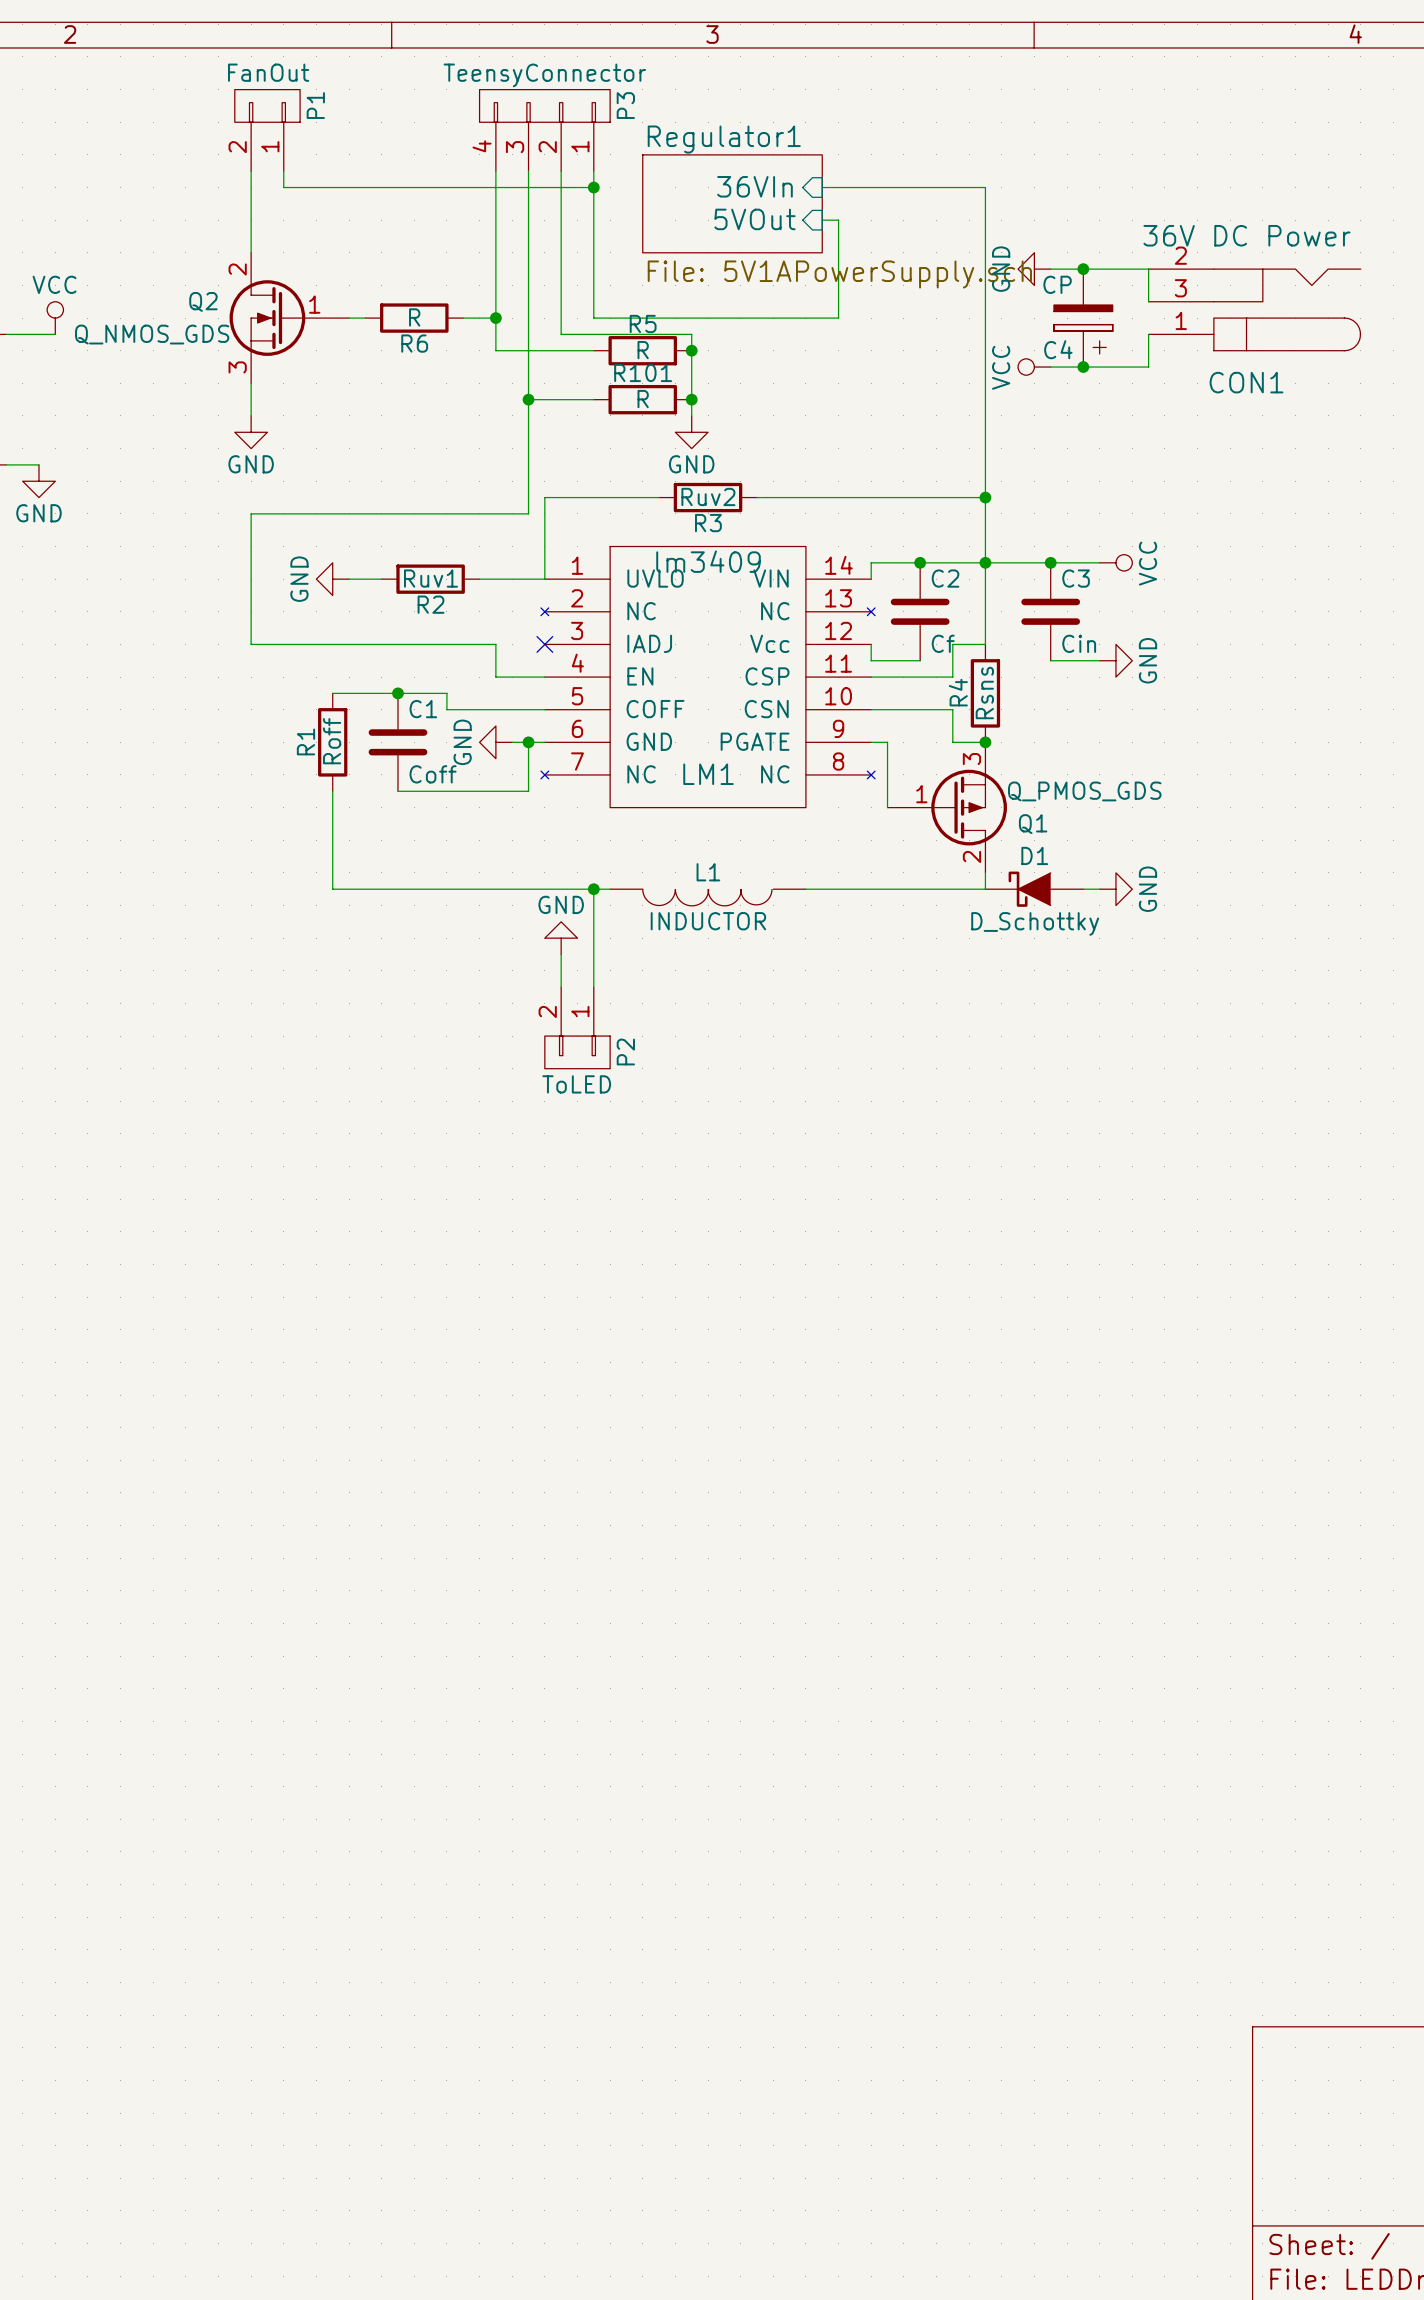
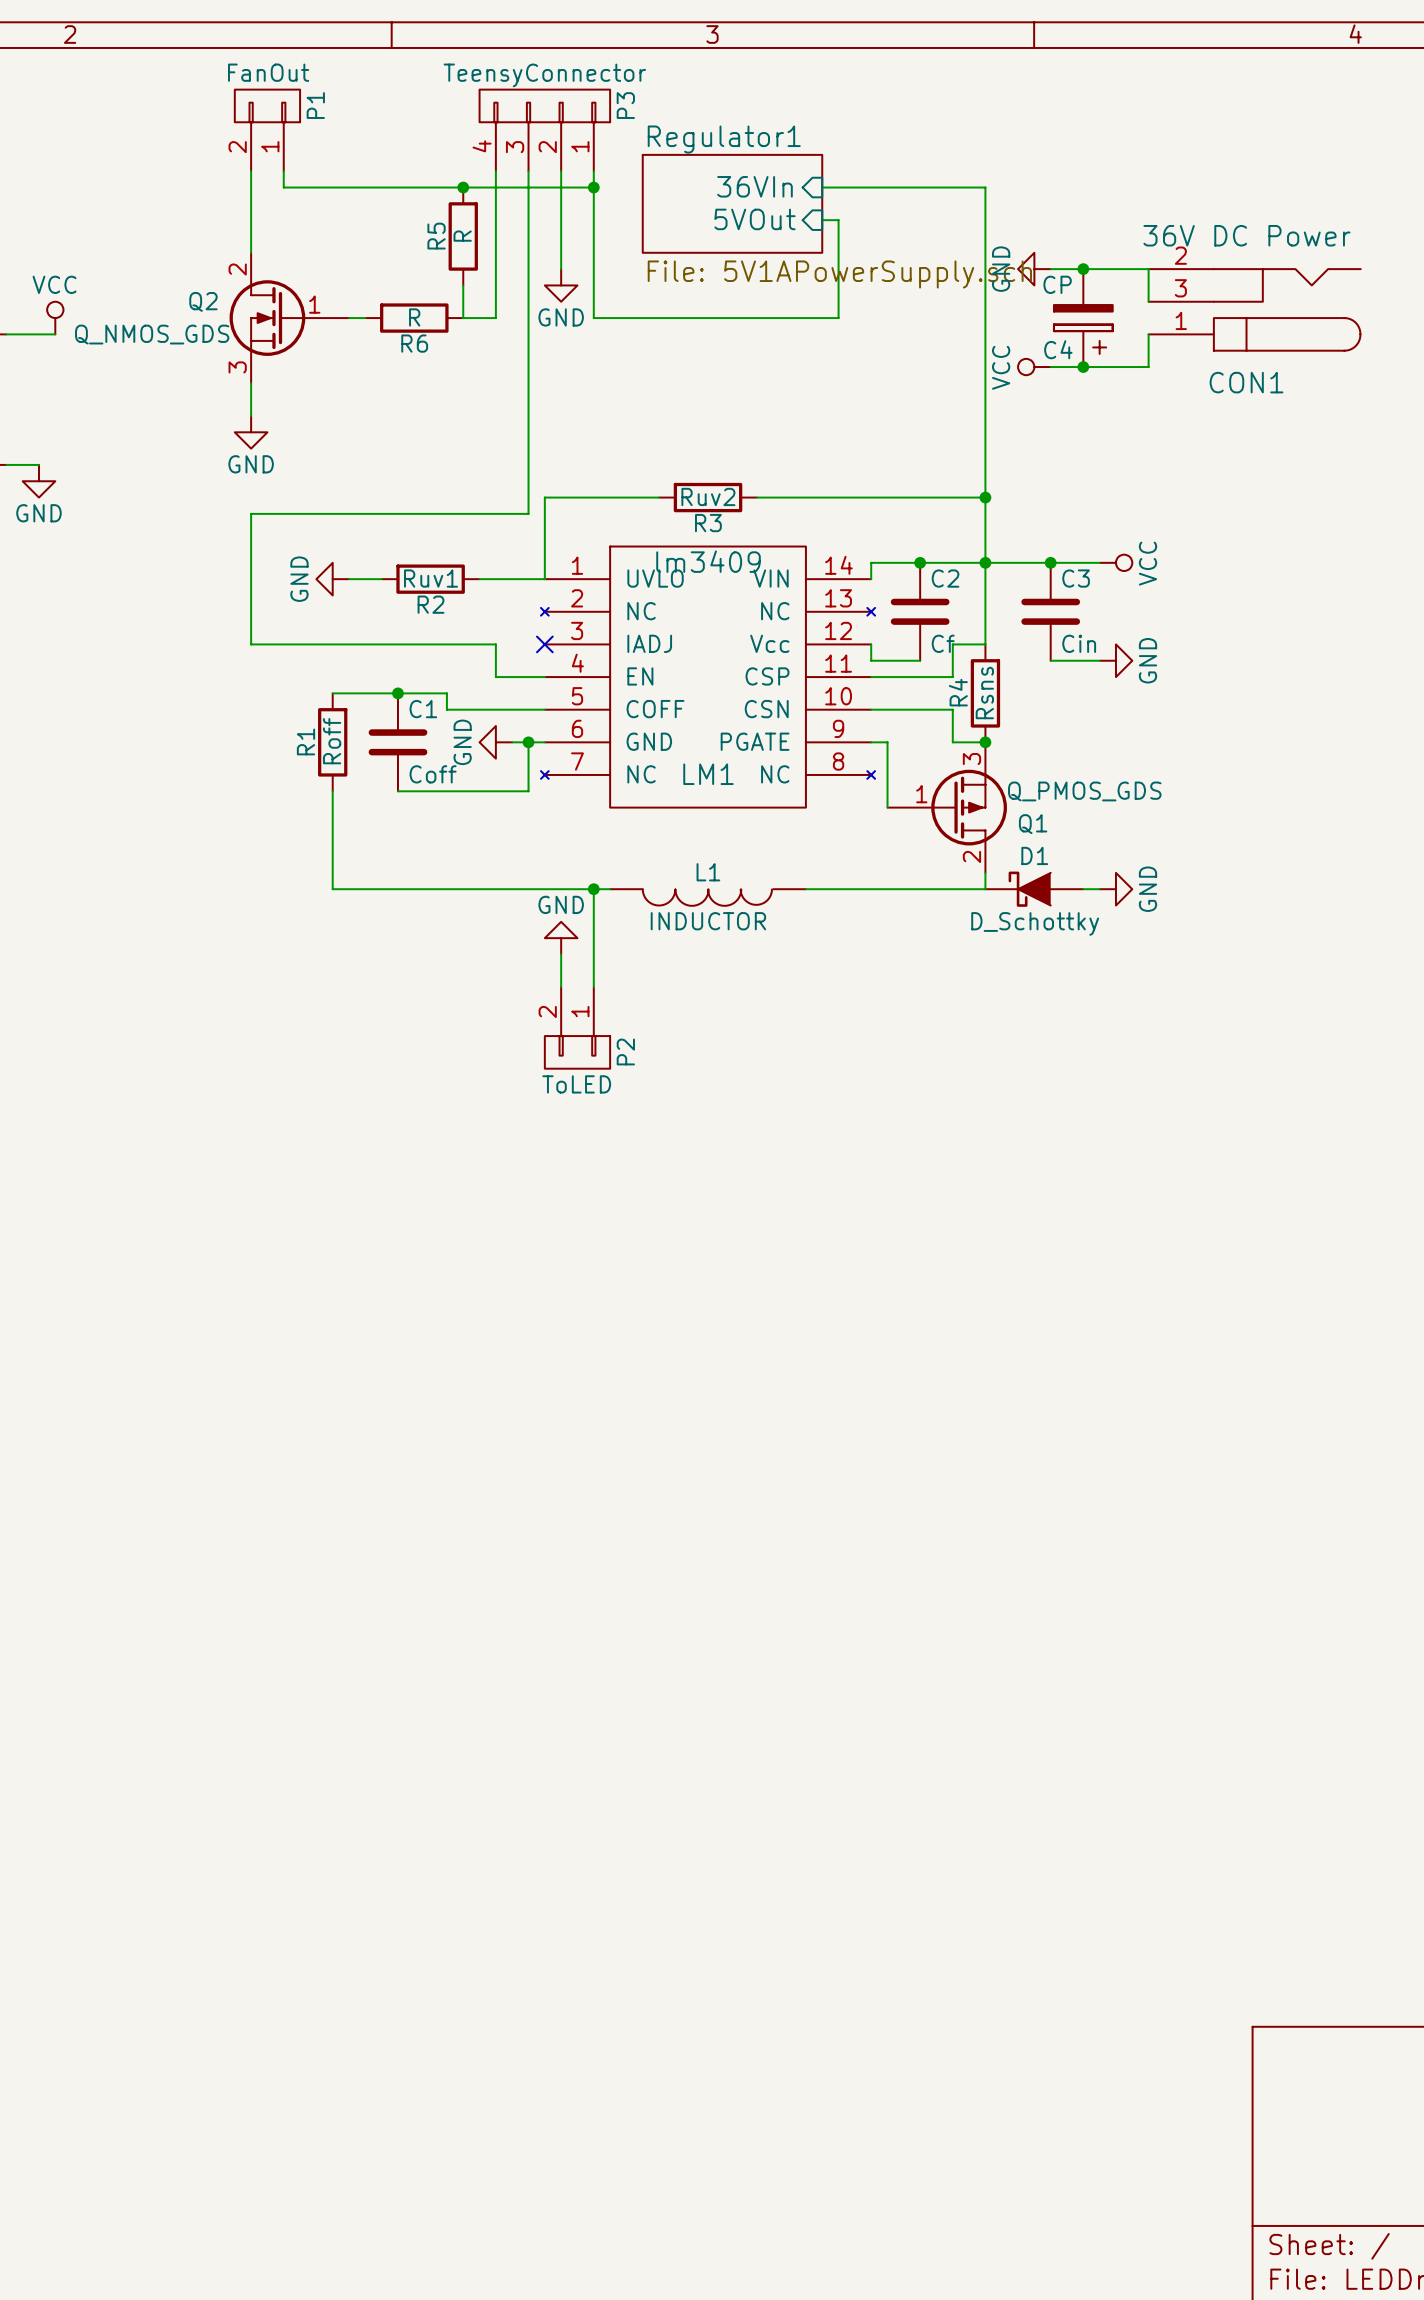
junction: none -> (463, 187)
wire: (561, 269) (561, 334) (691, 334) (691, 415) -> none
wire: none -> (463, 285) (463, 318)
wire: (495, 318) (495, 350) (593, 350) -> none
junction: (495, 318) -> none
R5 name position: R5 (643, 323) -> R5 (436, 236)
R5 rotation: 0° (642, 350) -> 90° clockwise (463, 236)
R5 position: (642, 350) -> (463, 236)
junction: (691, 350) -> none
wire: (528, 399) (593, 399) -> none
junction: (528, 399) -> none
R101: R (642, 399) -> none
junction: (691, 399) -> none
power symbol position: GND (691, 432) -> GND (561, 285)

